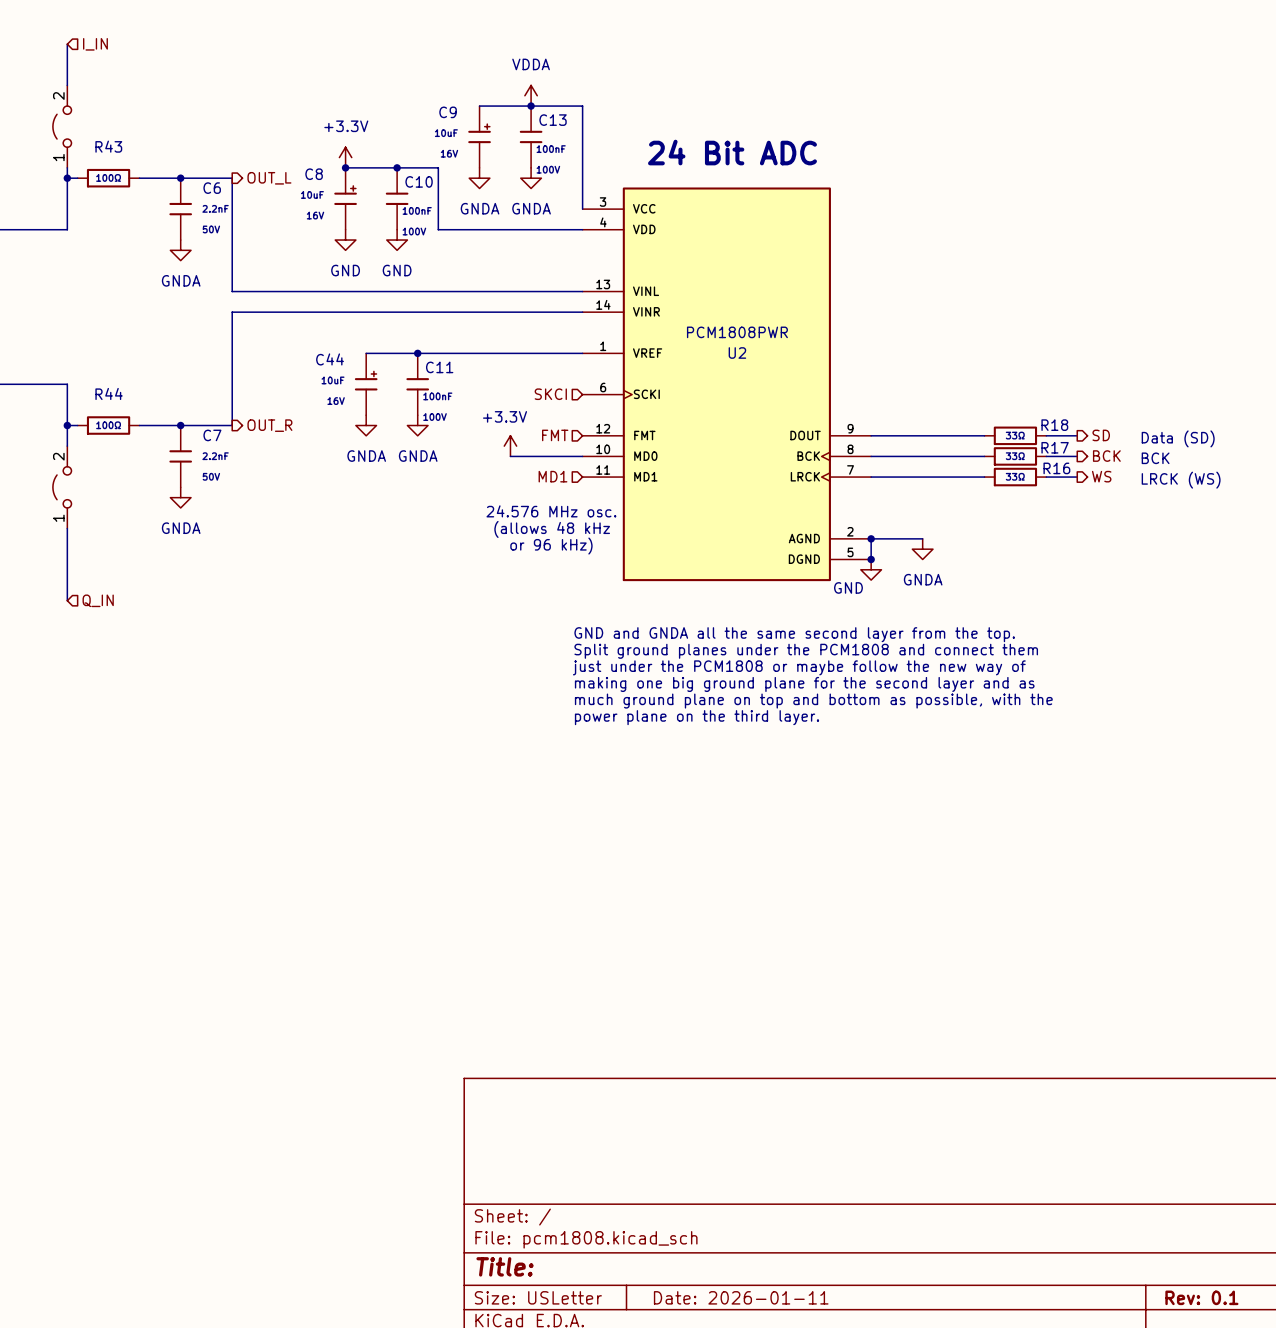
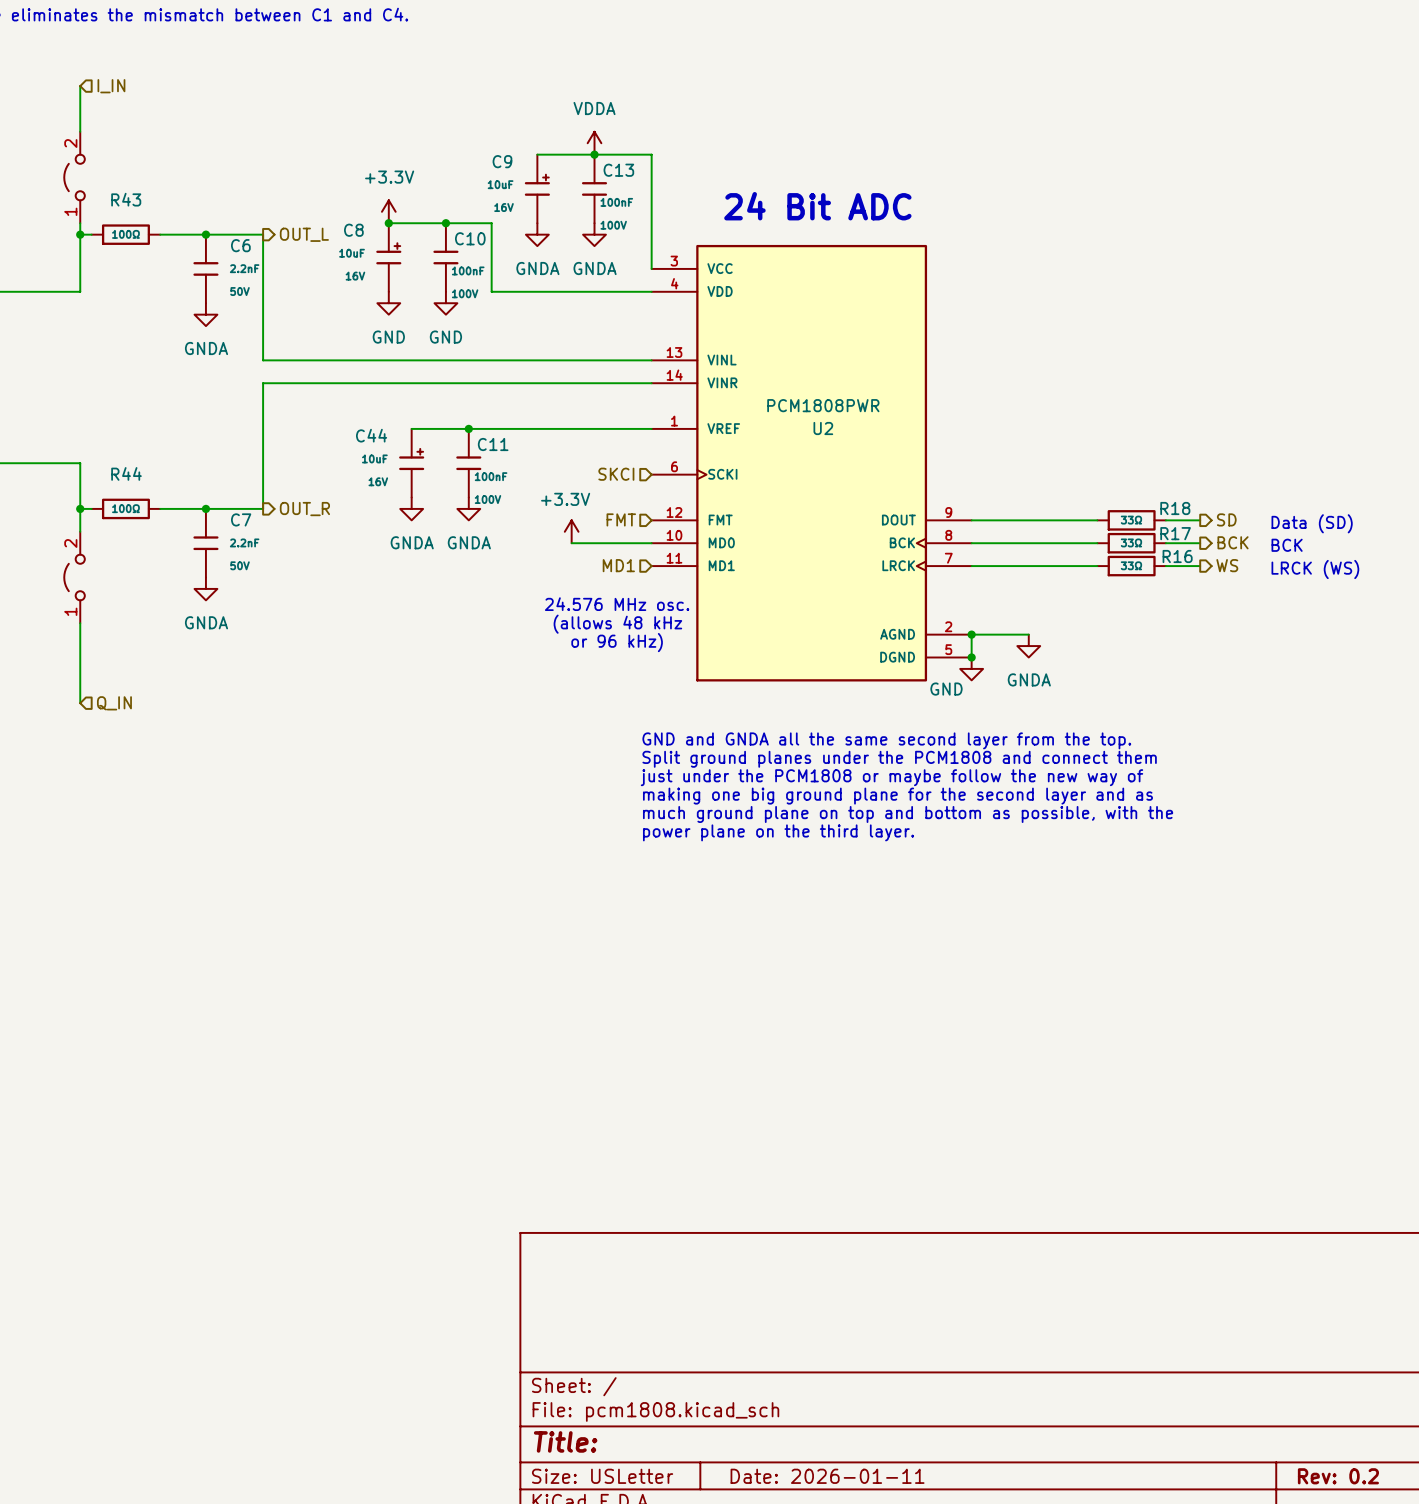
title block: Rev: 0.1 (1201, 1297) -> Rev: 0.2 (1338, 1476)

